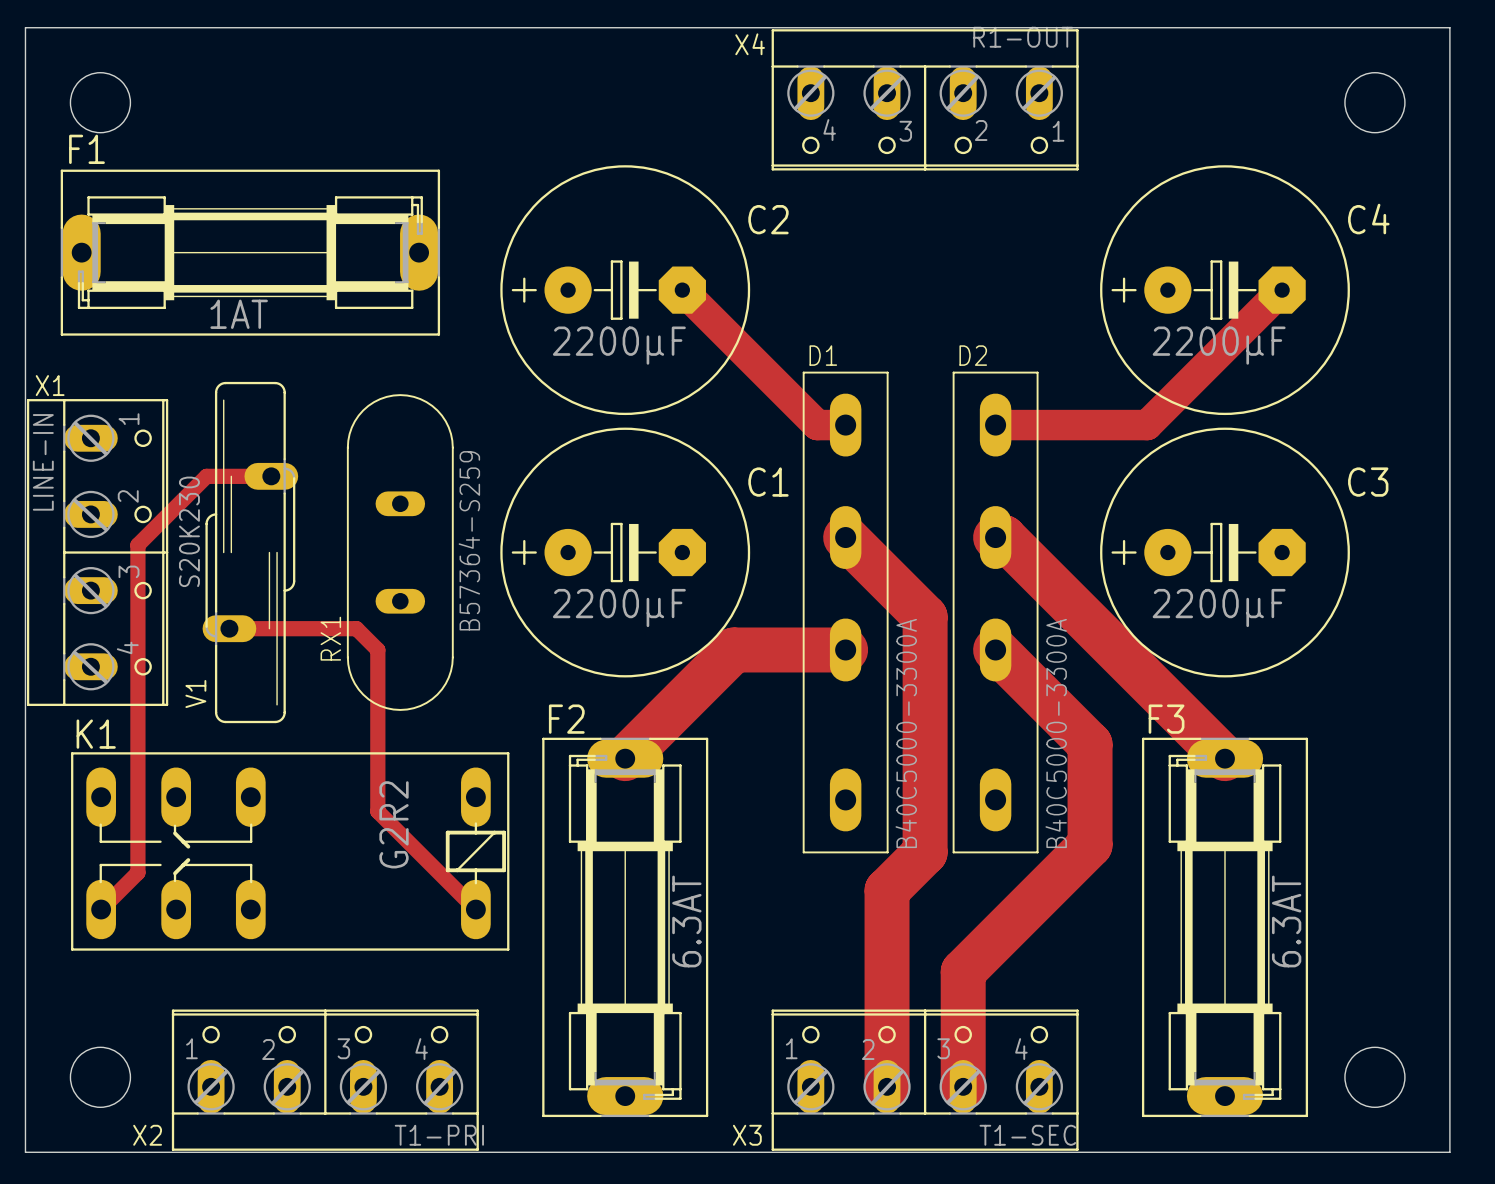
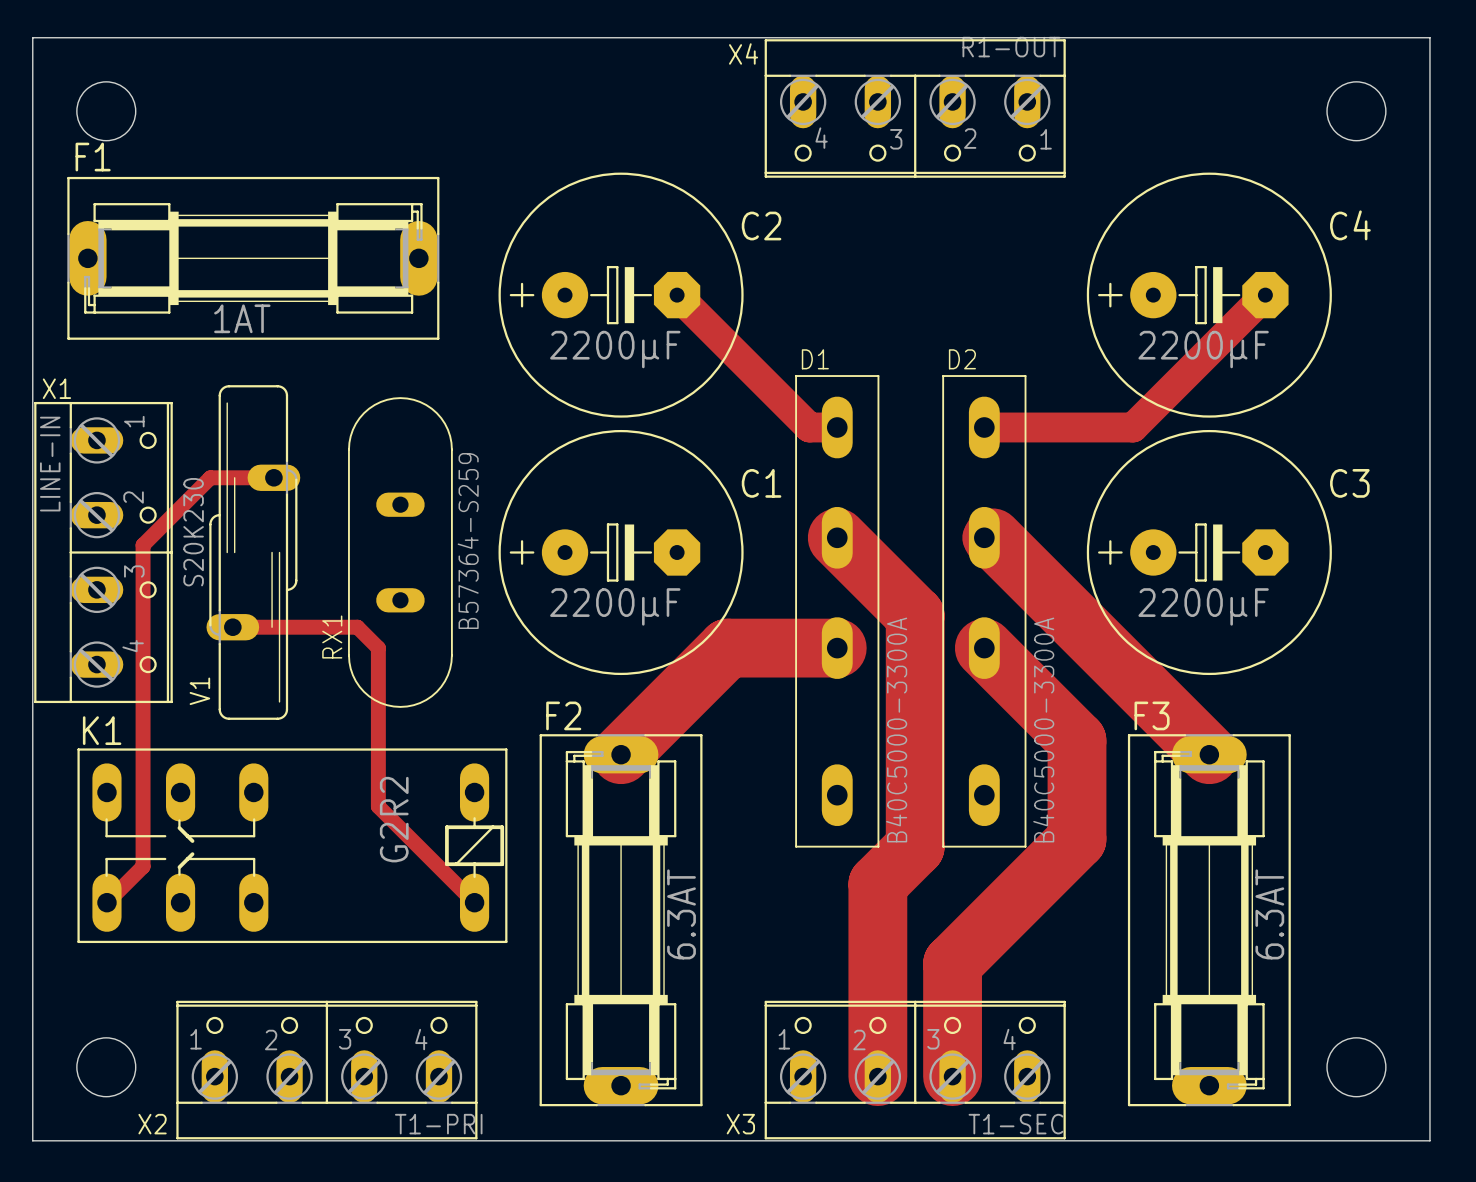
track width: thin (845, 537) (925, 616) (925, 852) (887, 890) (887, 1086) -> thick (837, 537) (915, 615) (915, 846) (877, 884) (877, 1076)
track width: thin (1003, 537) (1224, 758) -> thick (992, 537) (1209, 754)
track width: thin (845, 649) (733, 649) (625, 758) -> thick (837, 648) (727, 648) (621, 754)
track width: thin (995, 649) (1090, 744) (1090, 844) (963, 971) (963, 1086) -> thick (984, 648) (1076, 740) (1076, 839) (952, 963) (952, 1076)

